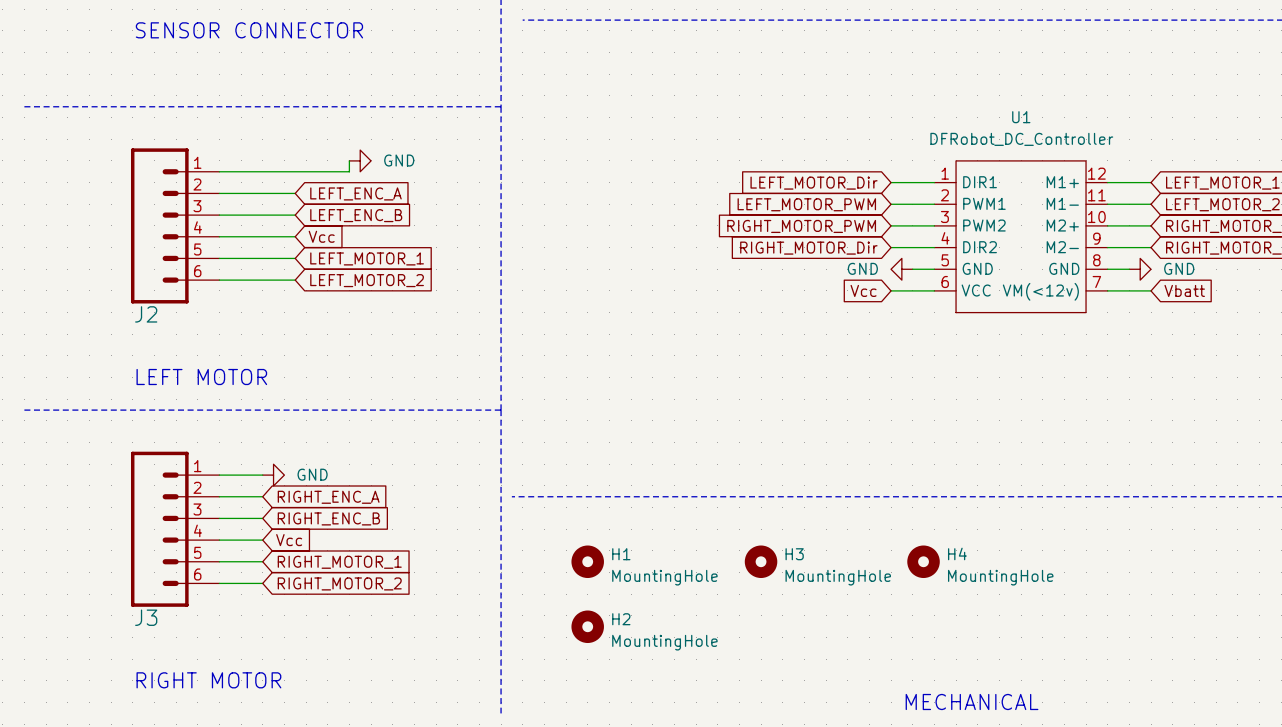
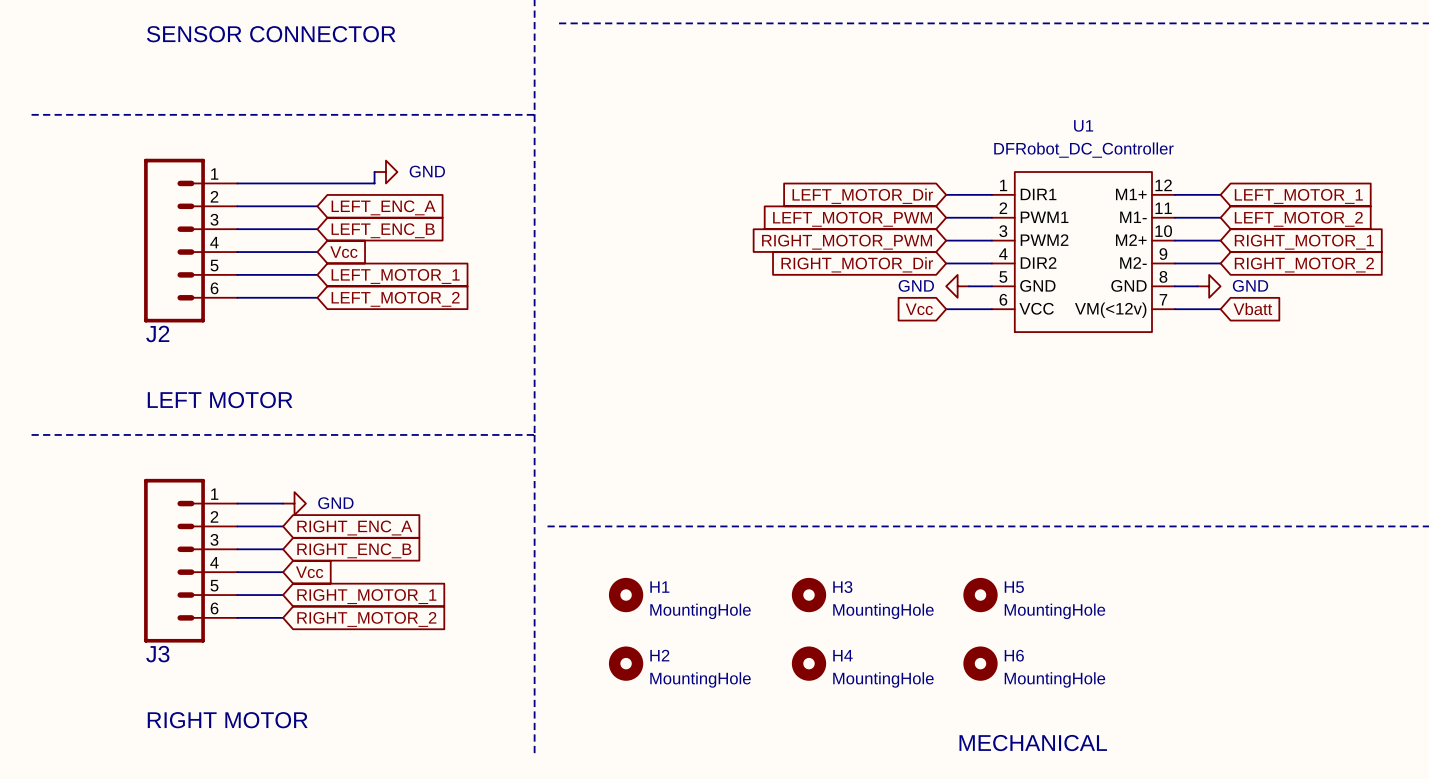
H4 name: H4 (957, 553) -> H5 (1014, 587)
H4: none -> MountingHole (809, 663)
H6: none -> MountingHole (980, 663)

